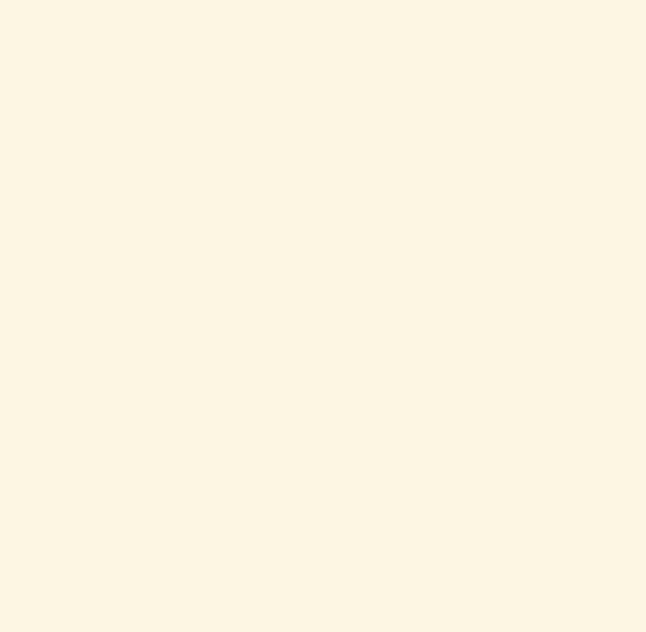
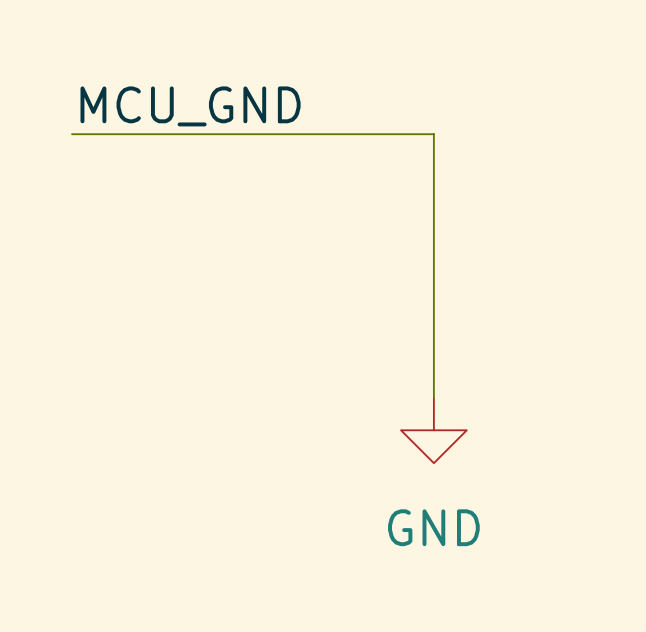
label: none -> MCU_GND (190, 106)
wire: none -> (72, 134) (433, 134) (433, 397)
power symbol: none -> GND (433, 430)

